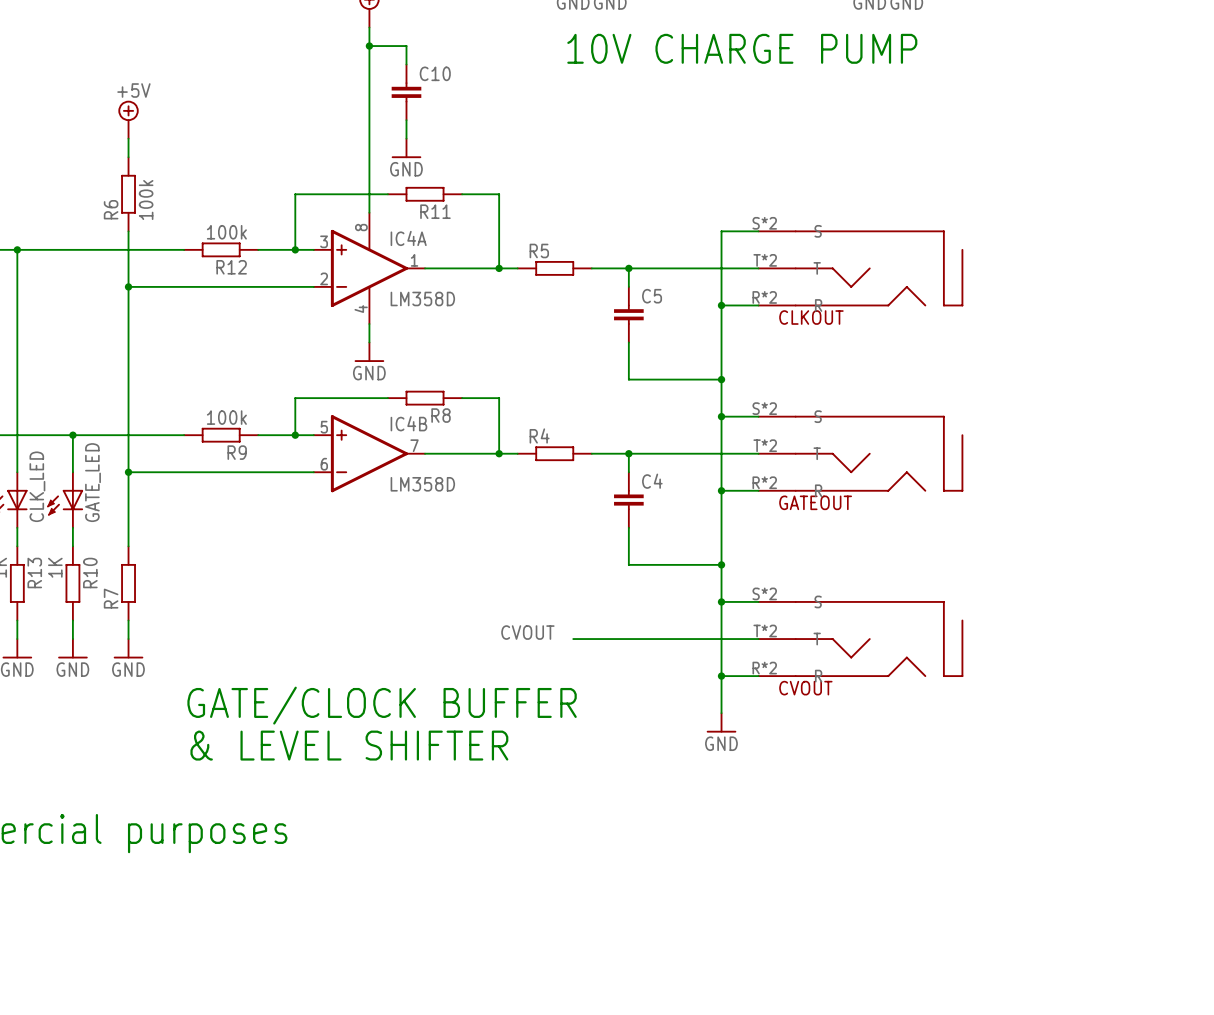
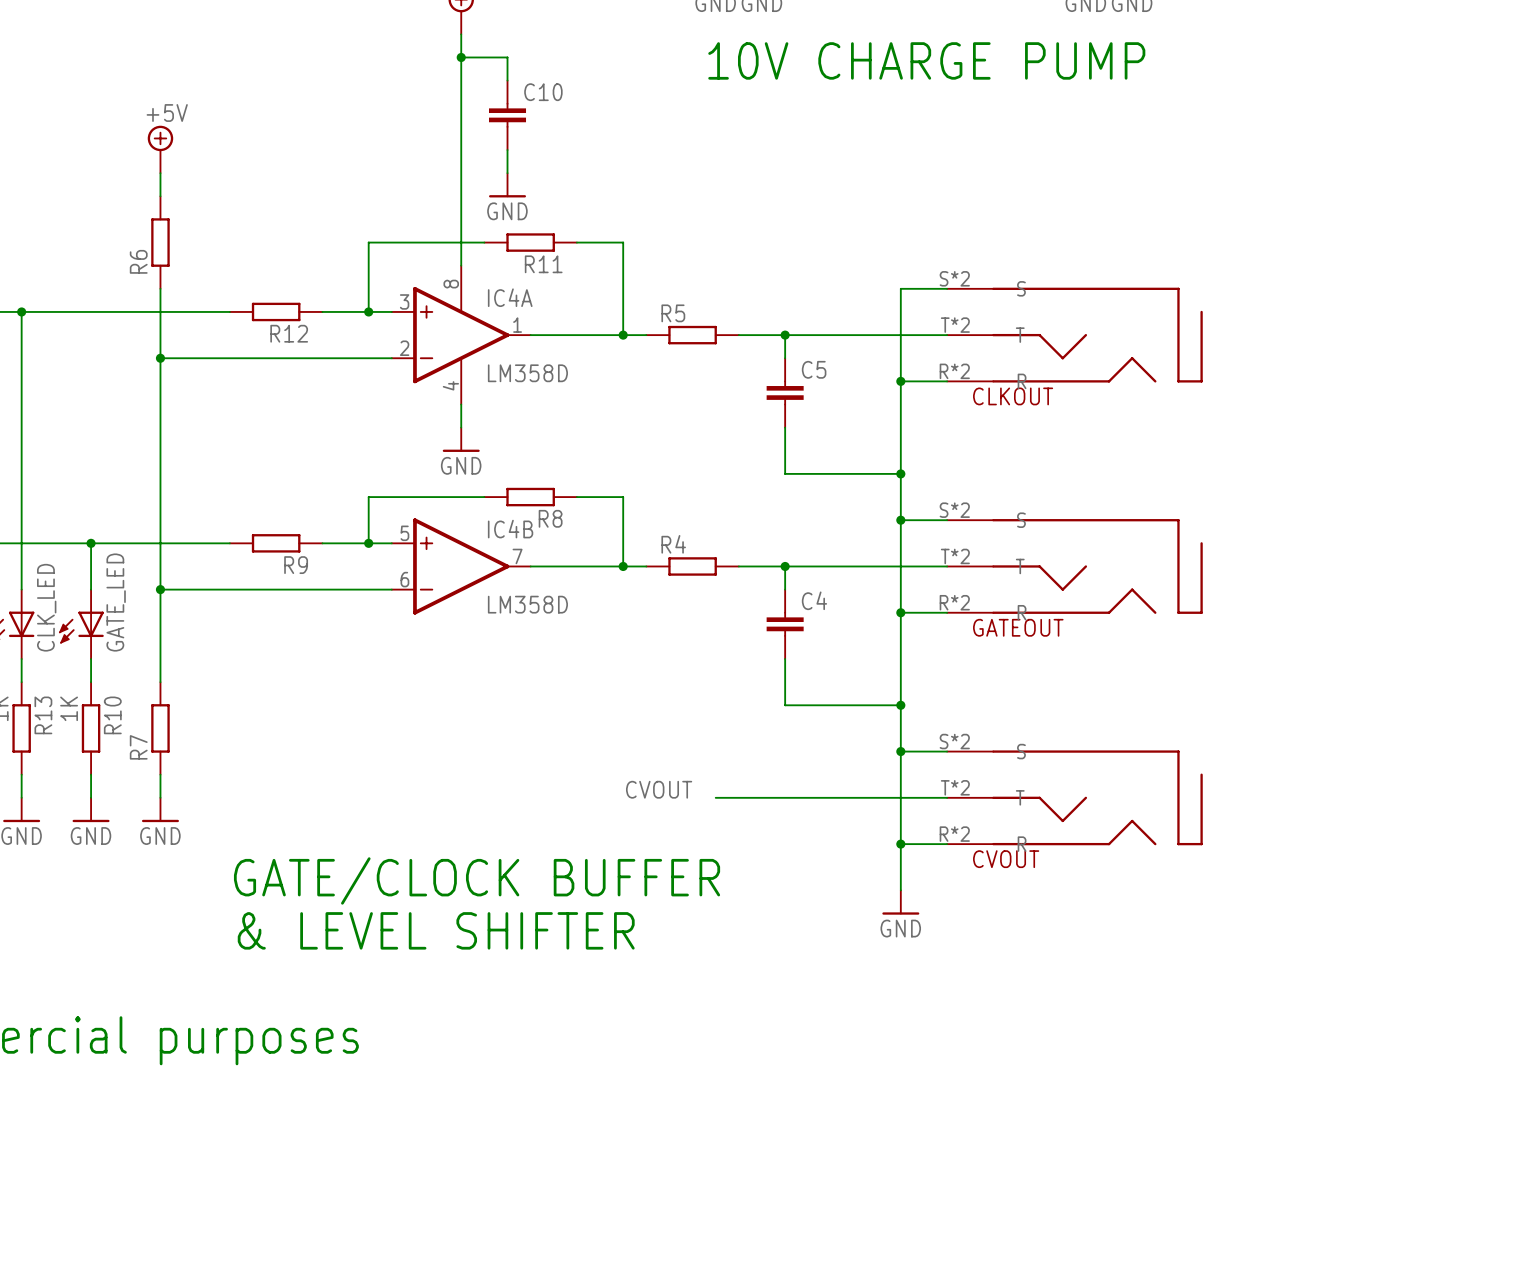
R6 value: 100k (146, 199) -> none
R12 value: 100k (226, 232) -> none
R9 value: 100k (226, 417) -> none

